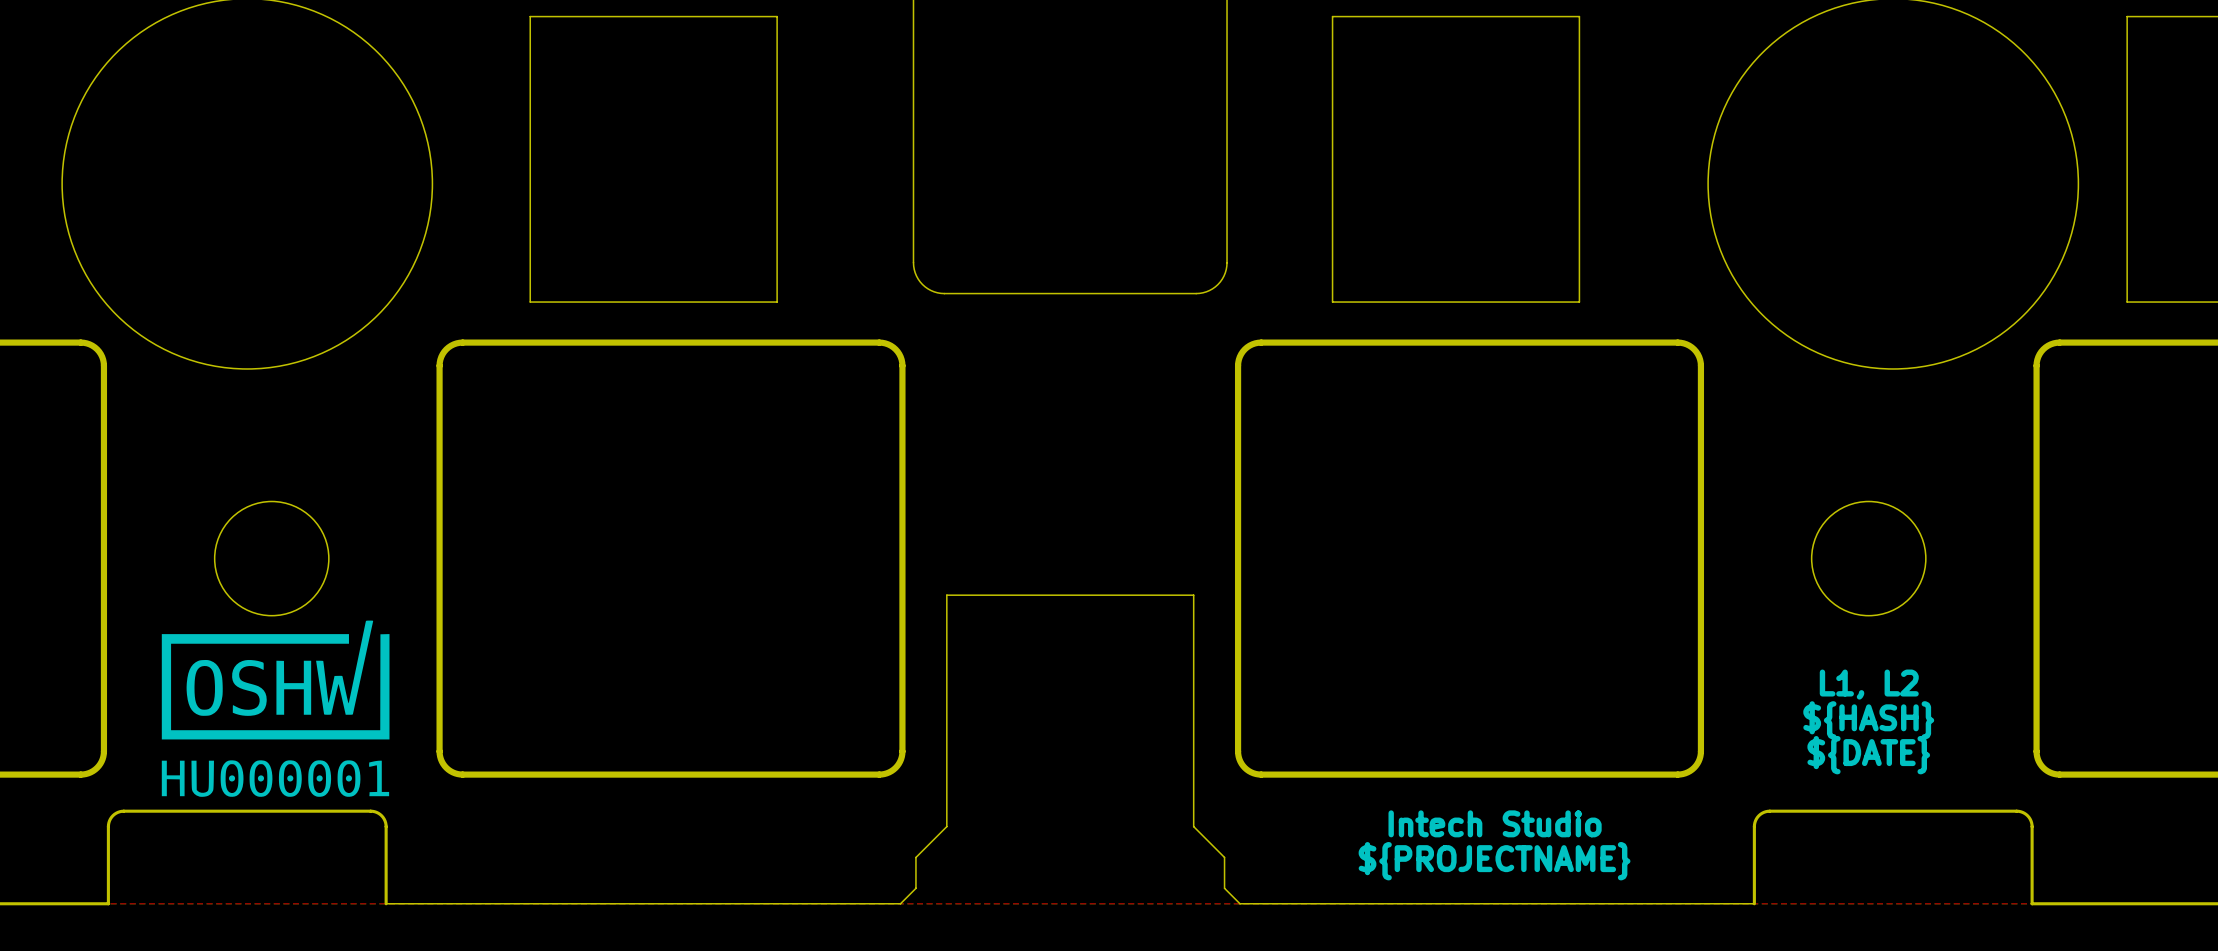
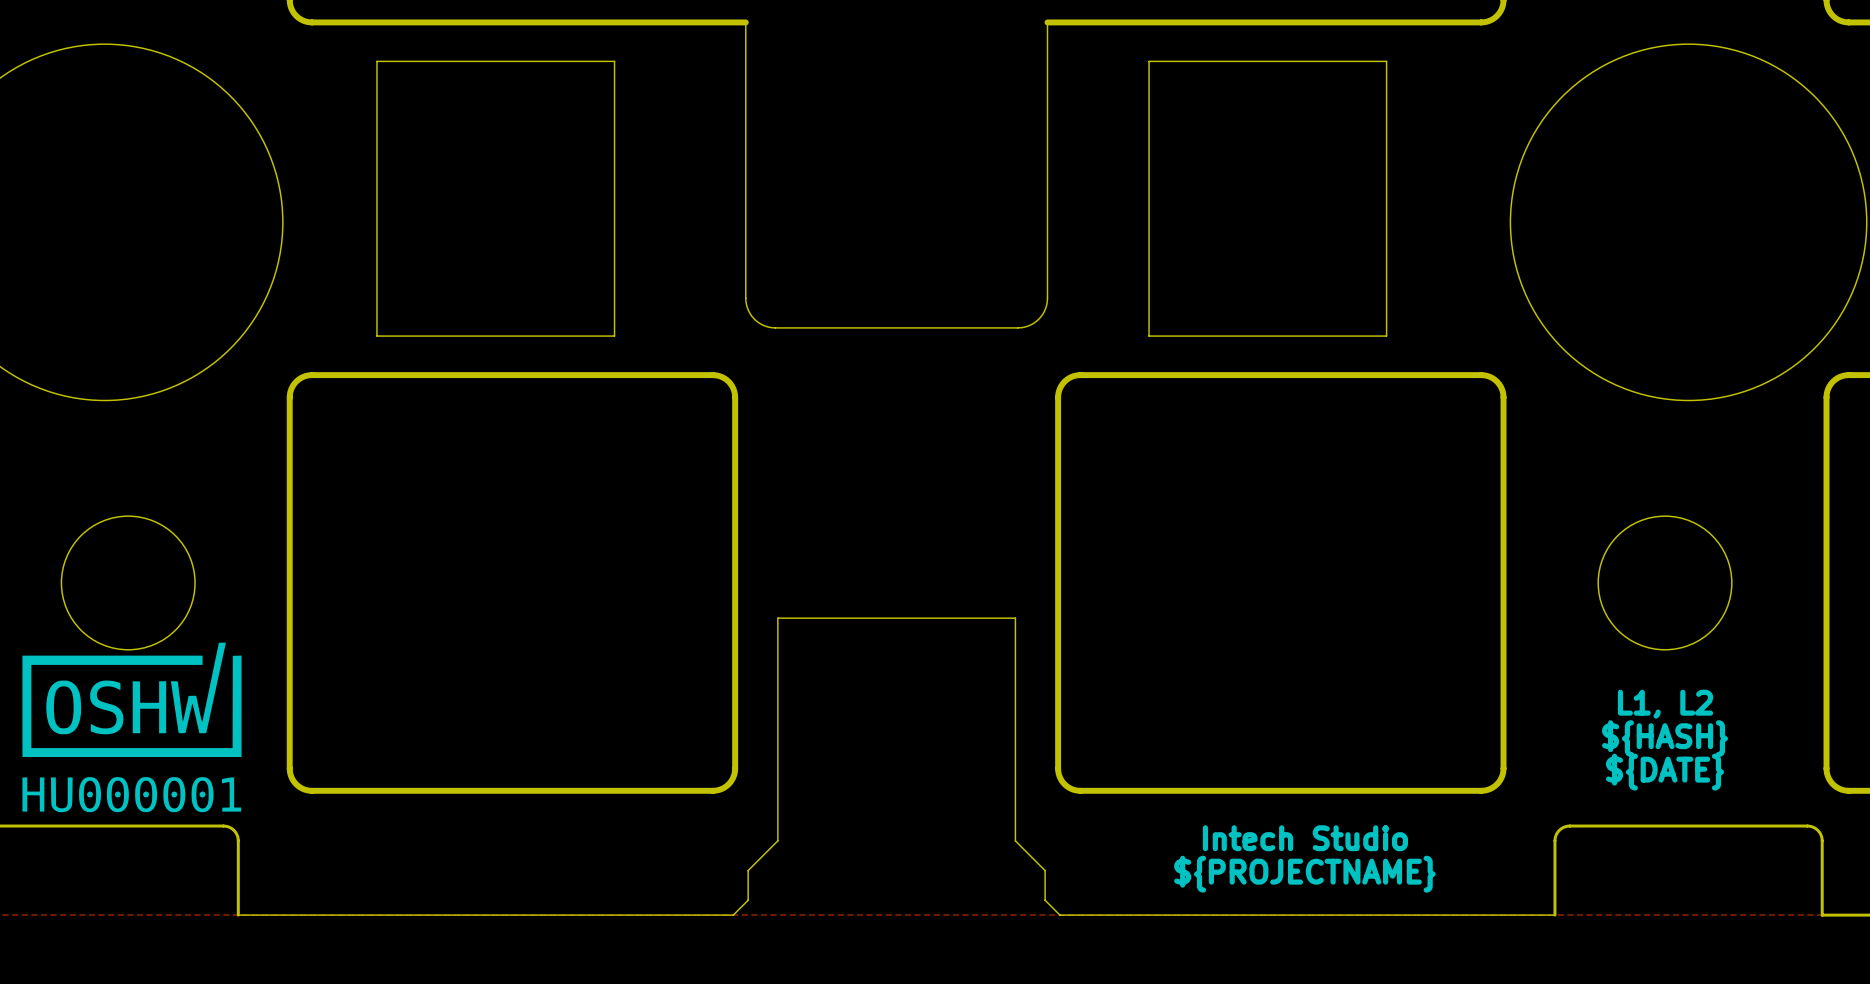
round board edge size: [213, 500, 330, 617] -> [60, 515, 196, 651]
round board edge size: [1810, 500, 1927, 617] -> [1597, 515, 1733, 651]

